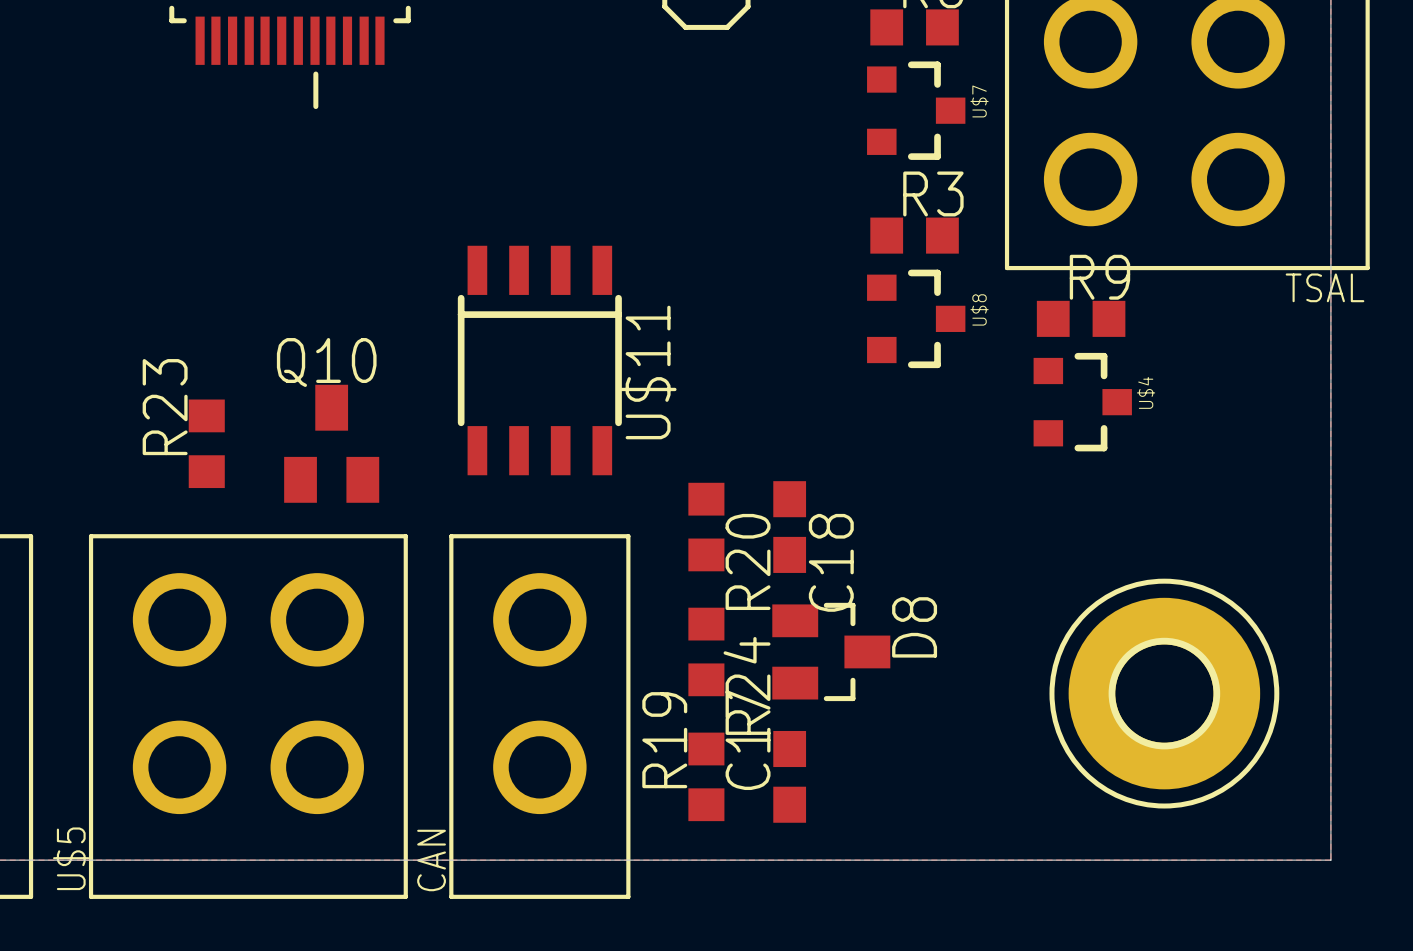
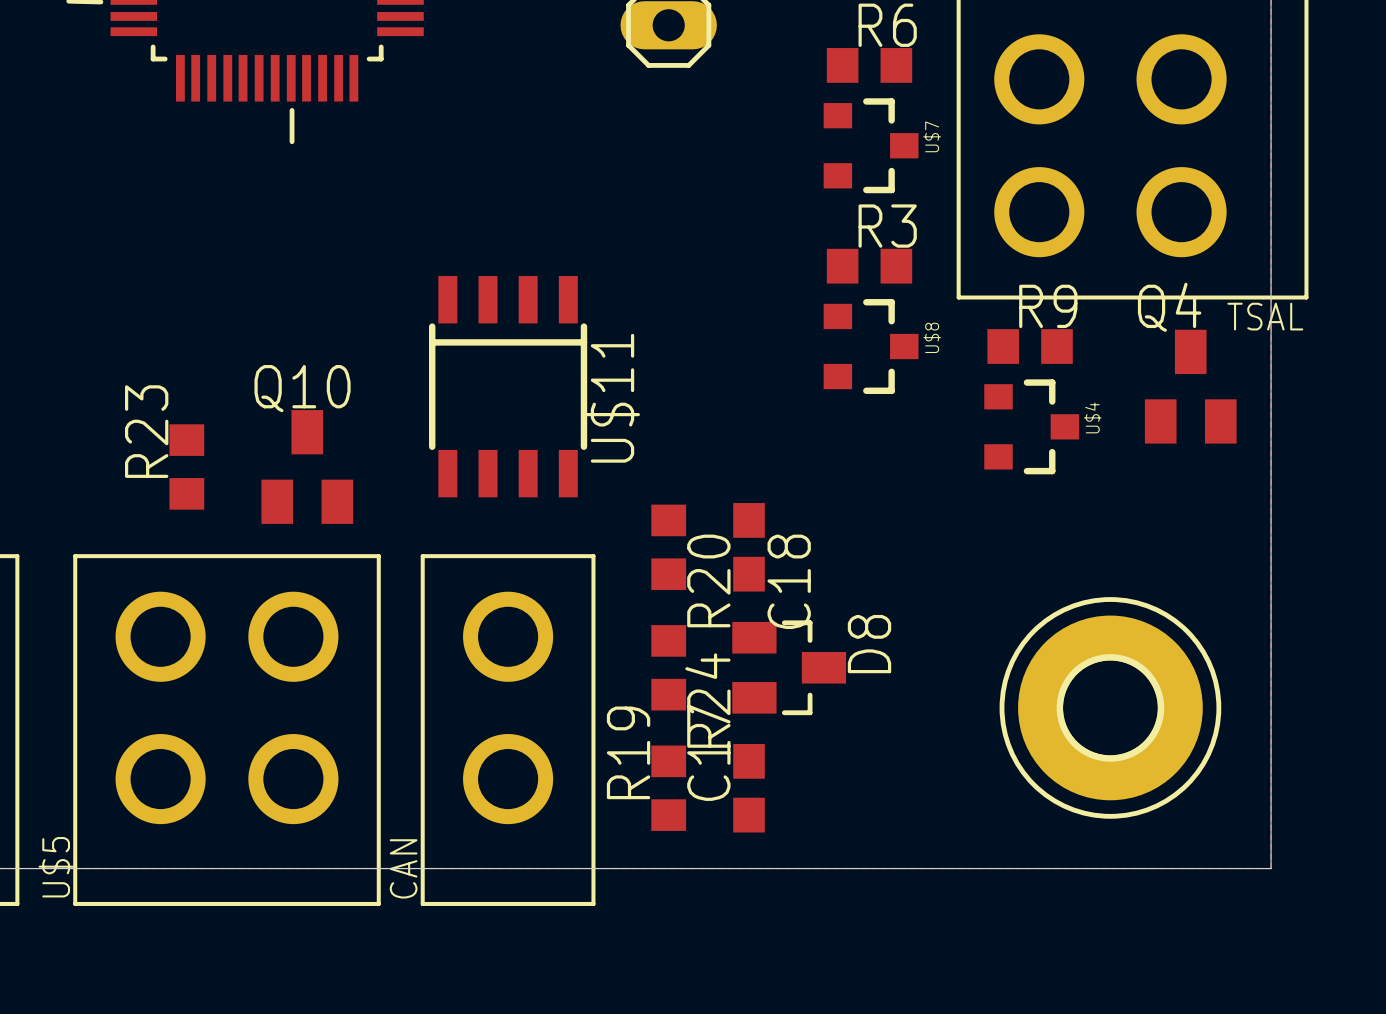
Q4: none -> (1190, 386)

